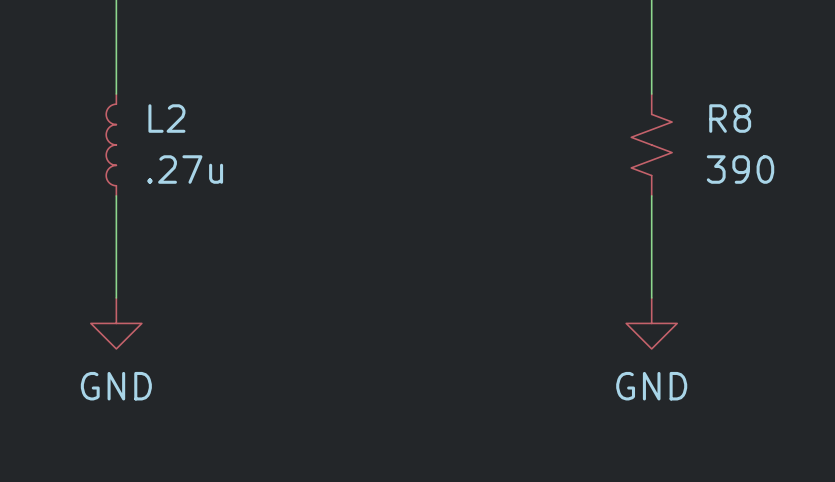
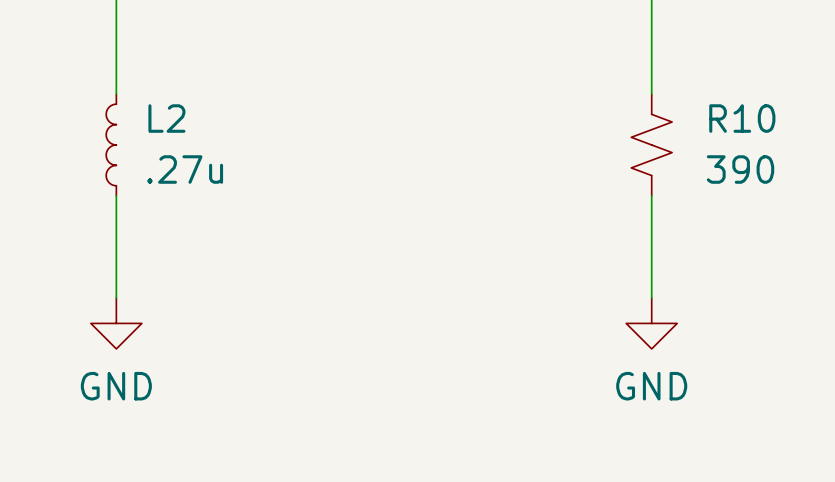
R8 name: R8 (730, 118) -> R10 (742, 118)

